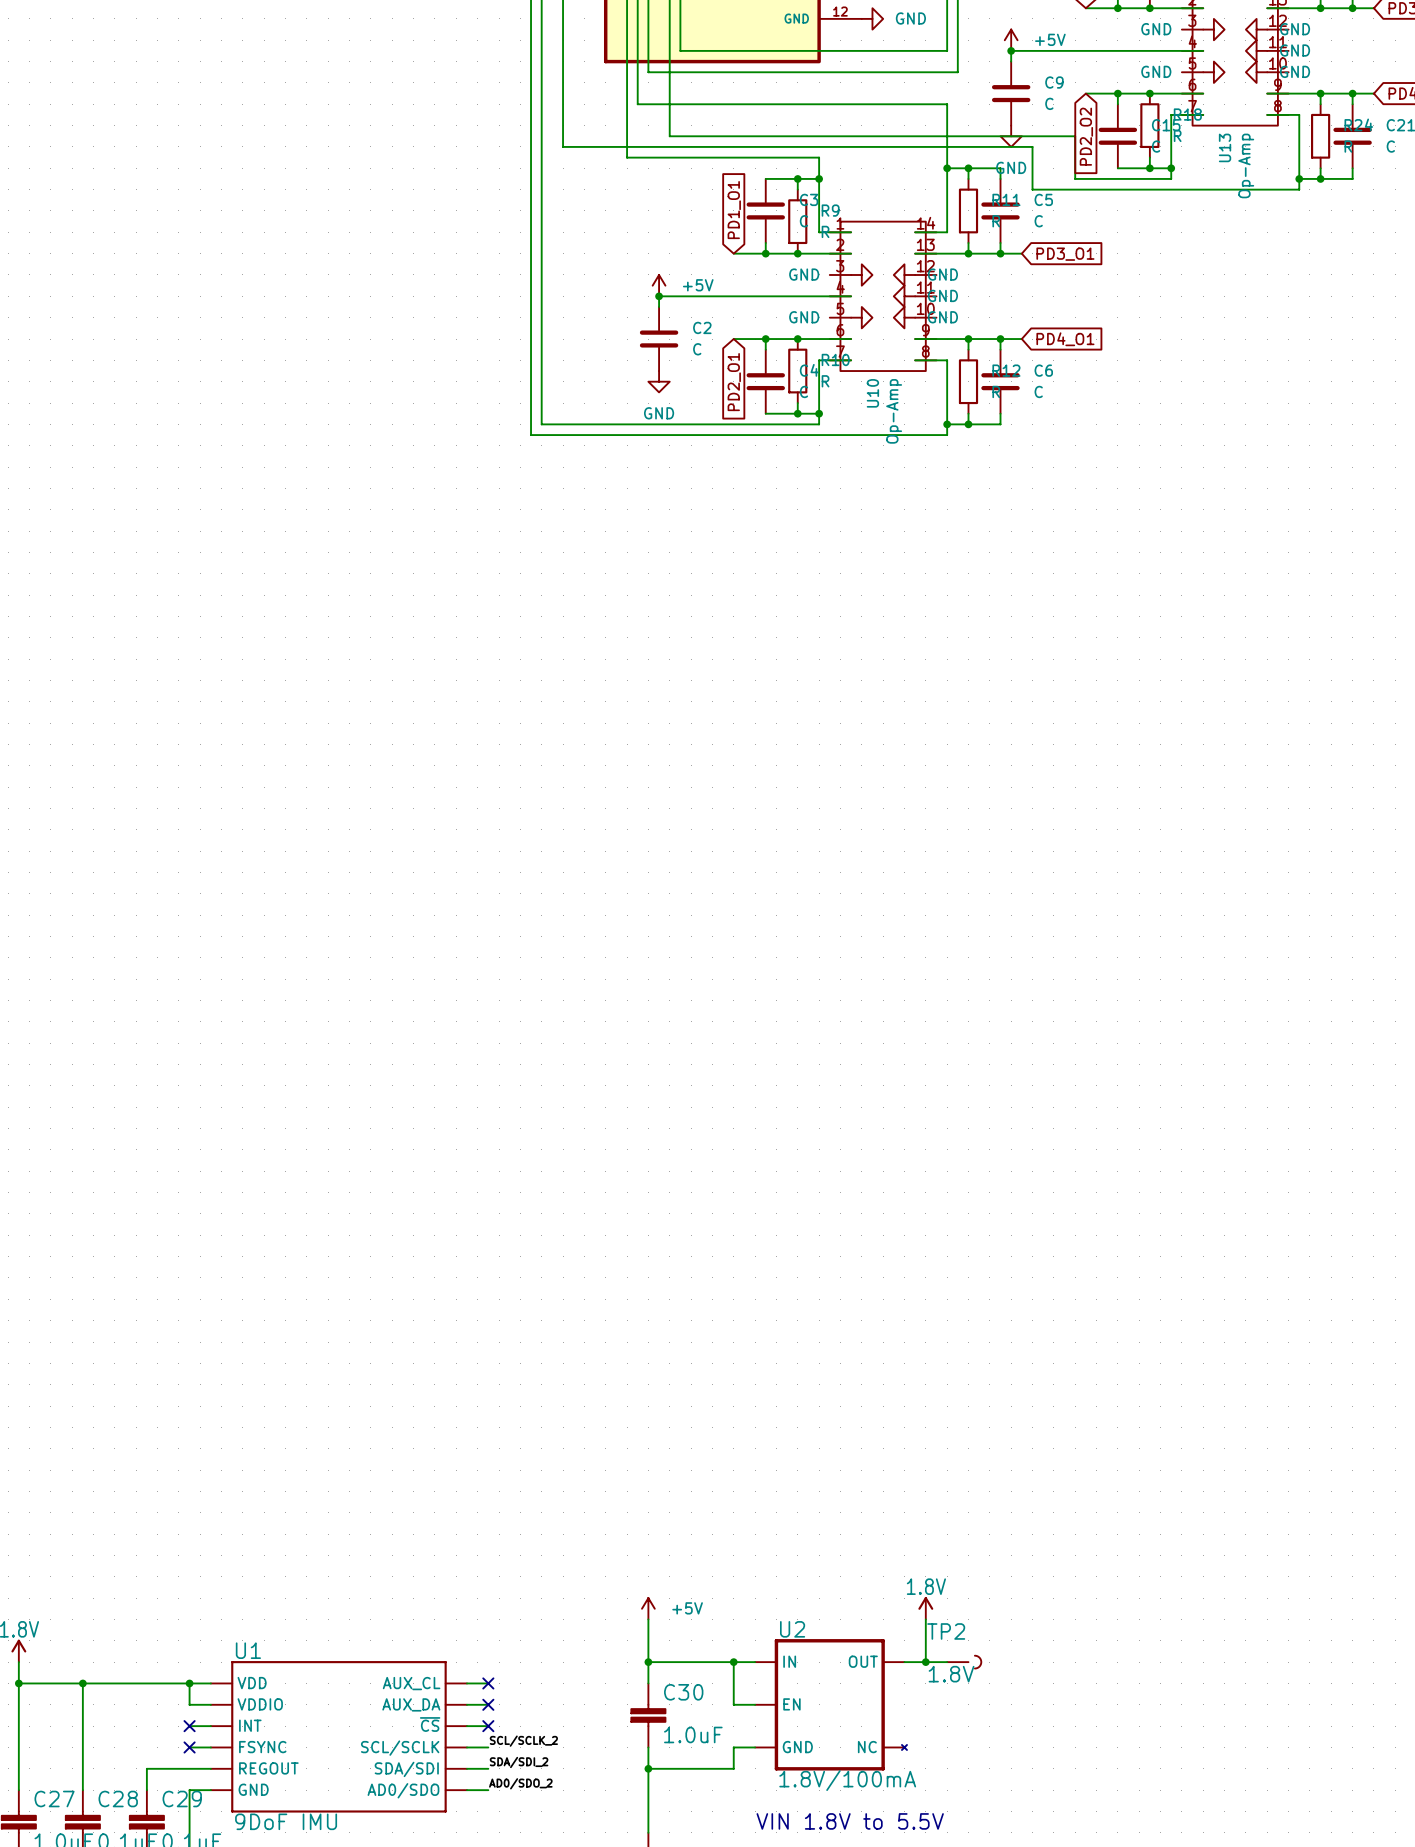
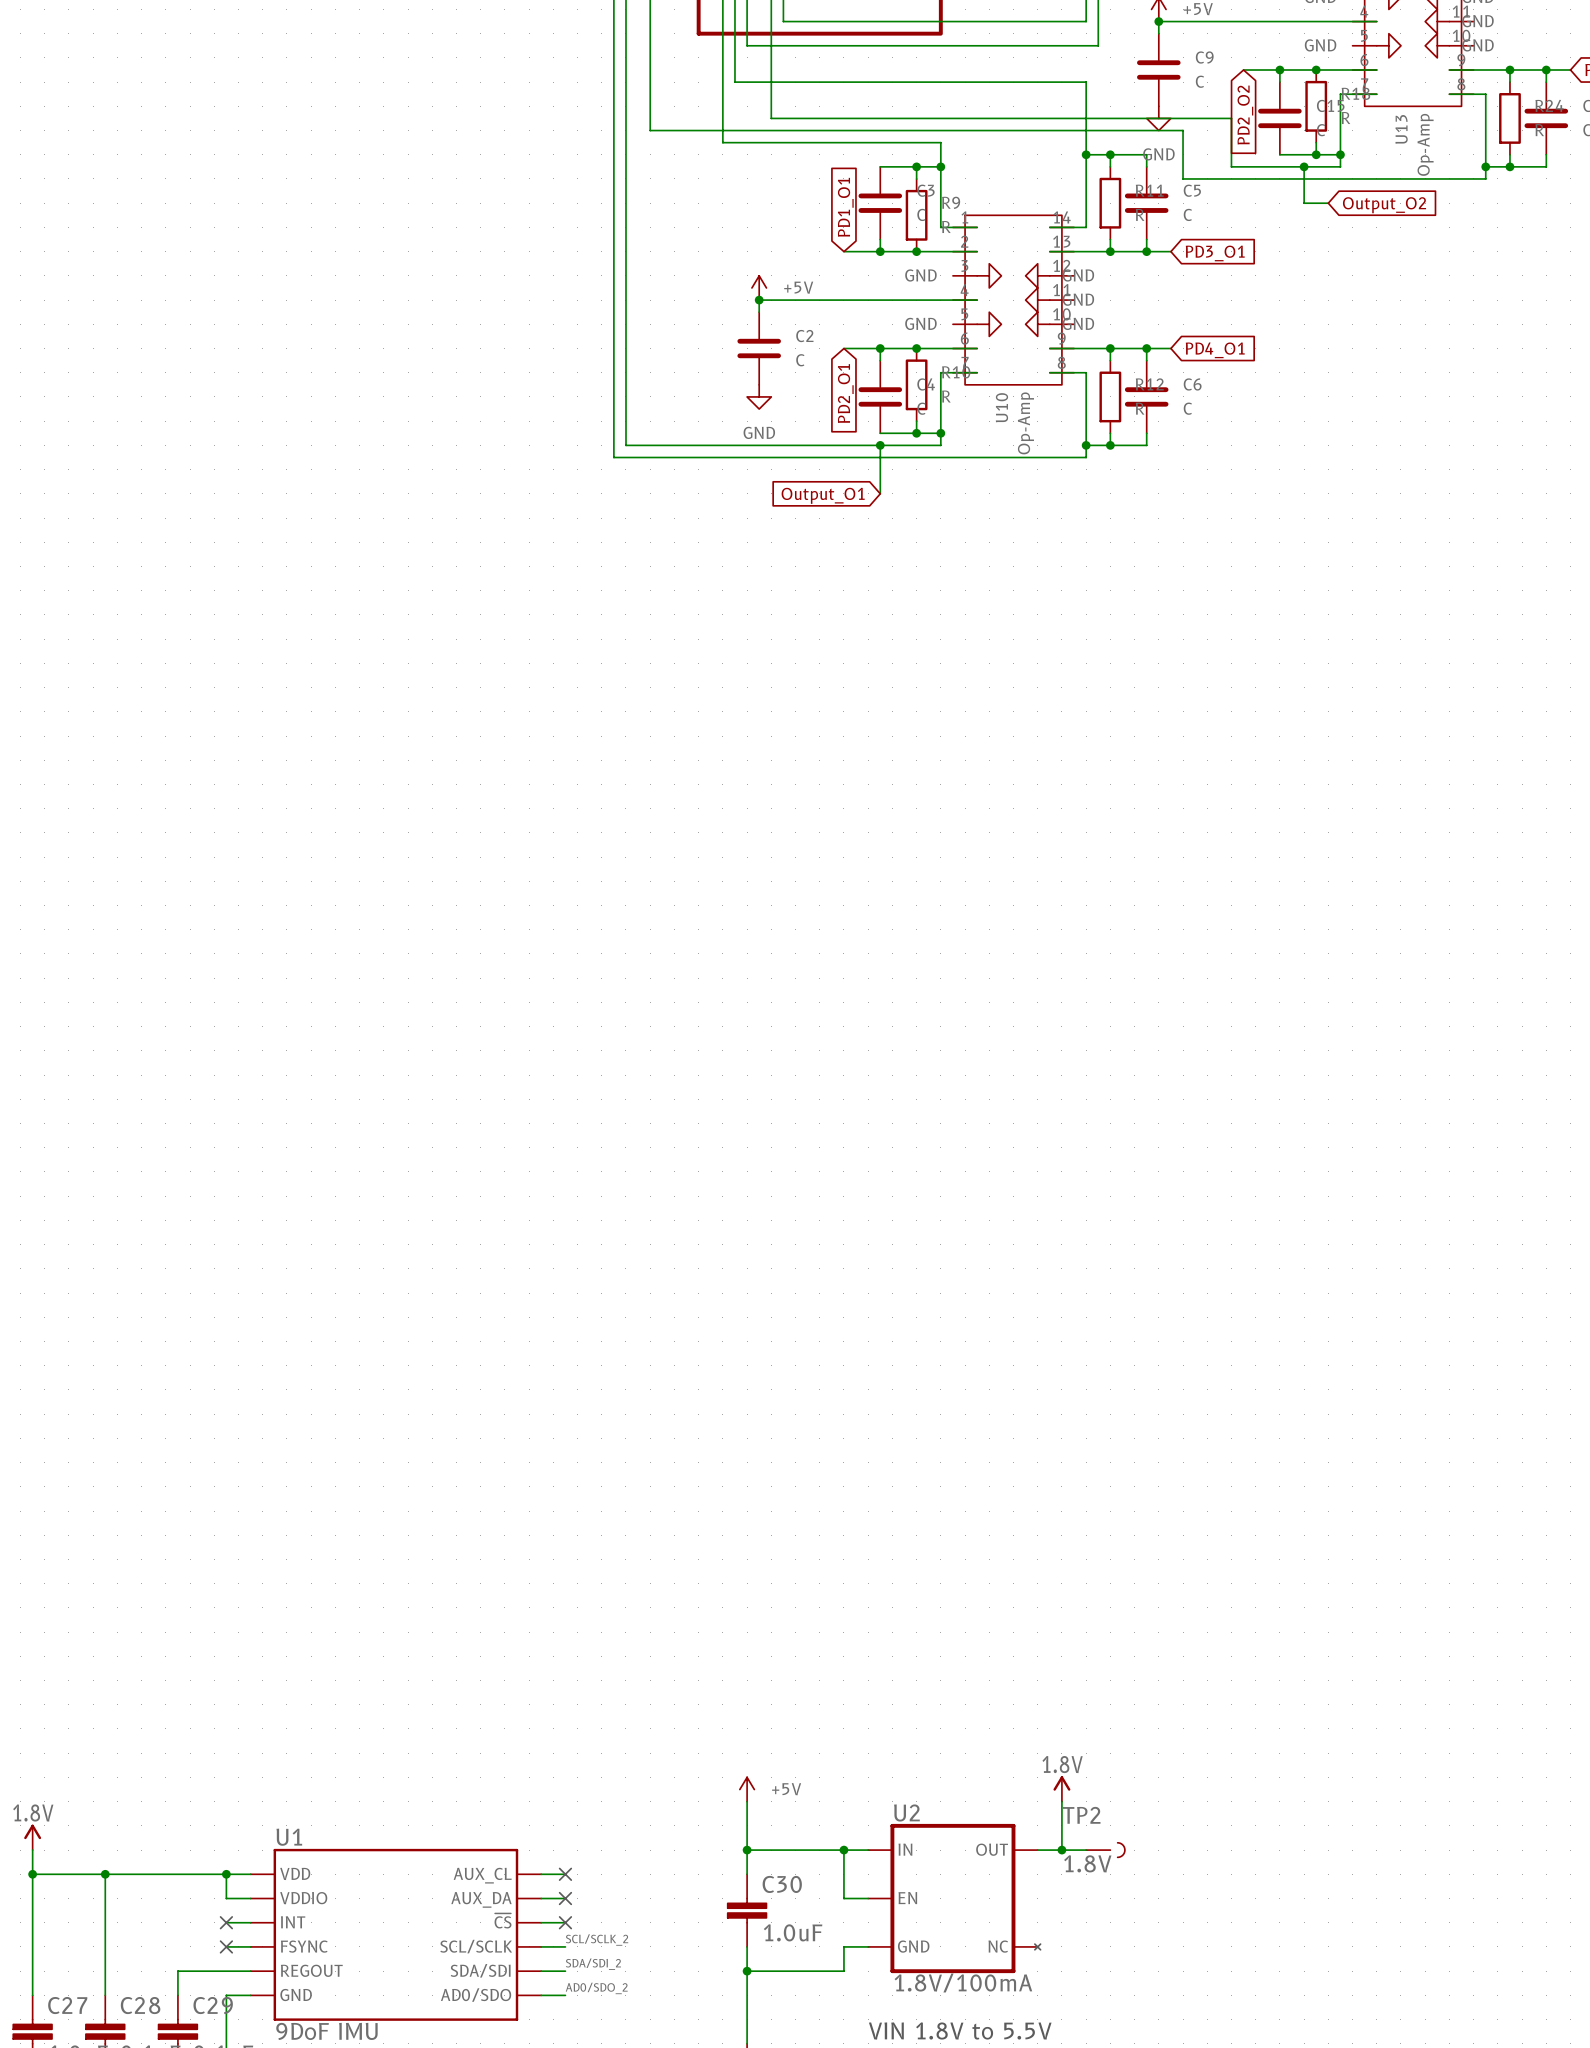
wire: none -> (1304, 166) (1304, 203) (1328, 203)
junction: none -> (1304, 166)
global label: none -> Output_O2 (1384, 205)
wire: none -> (880, 445) (880, 493)
junction: none -> (880, 445)
global label: none -> Output_O1 (823, 495)

